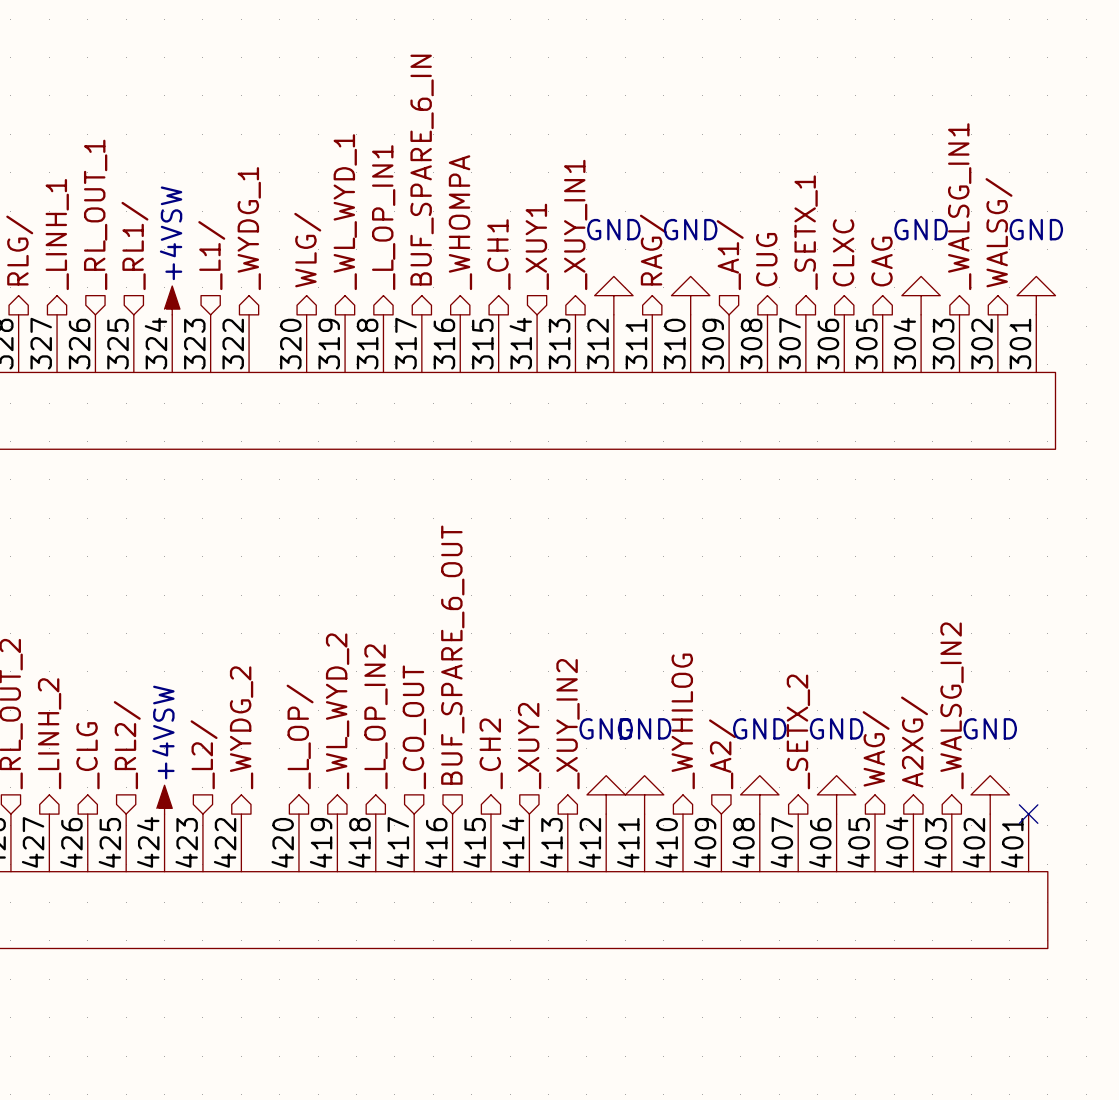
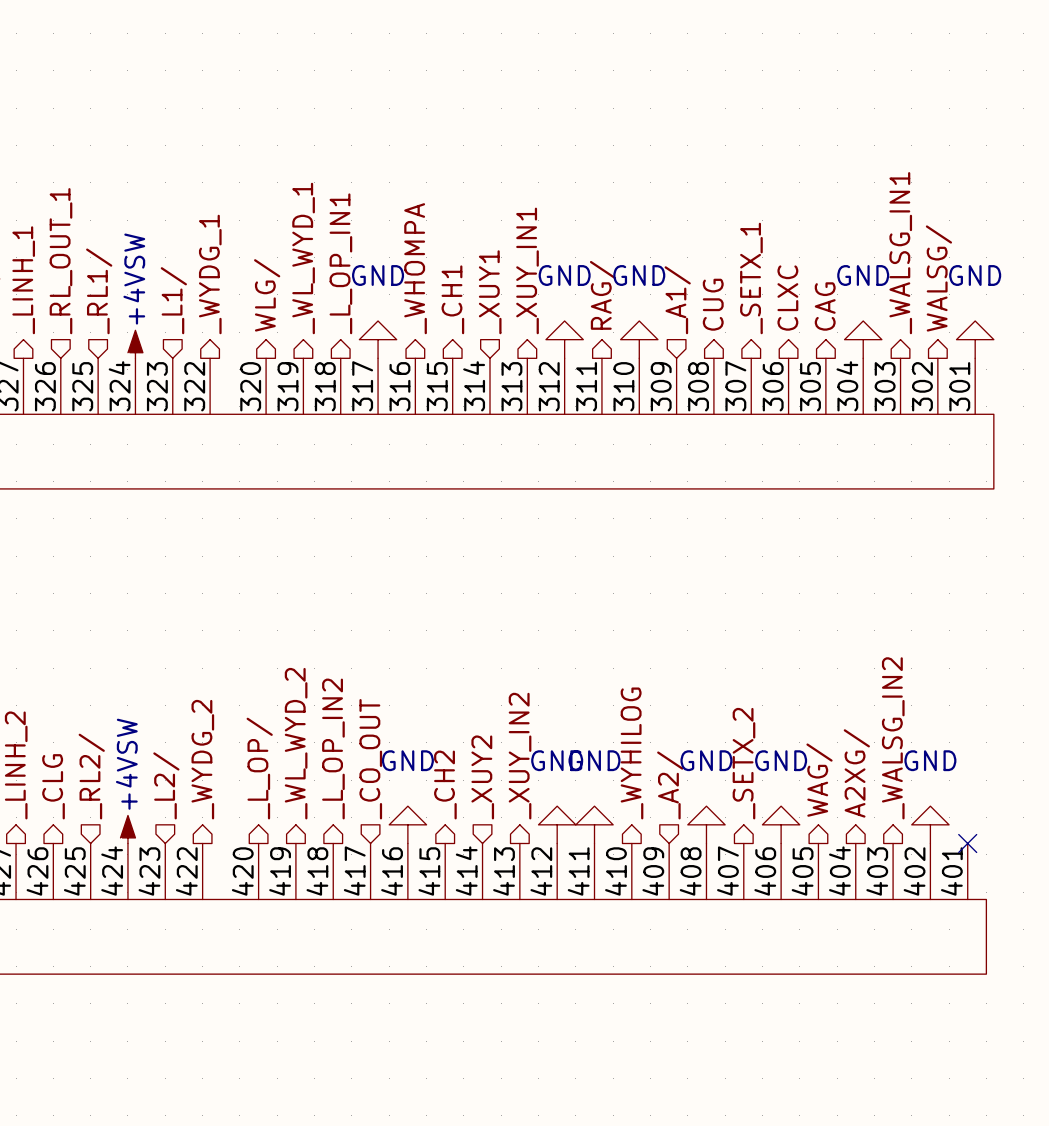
hierarchical label: BUF_SPARE_6_IN (422, 170) -> none
power symbol: none -> GND (378, 339)
hierarchical label: BUF_SPARE_6_OUT (452, 655) -> none
power symbol: none -> GND (407, 824)

